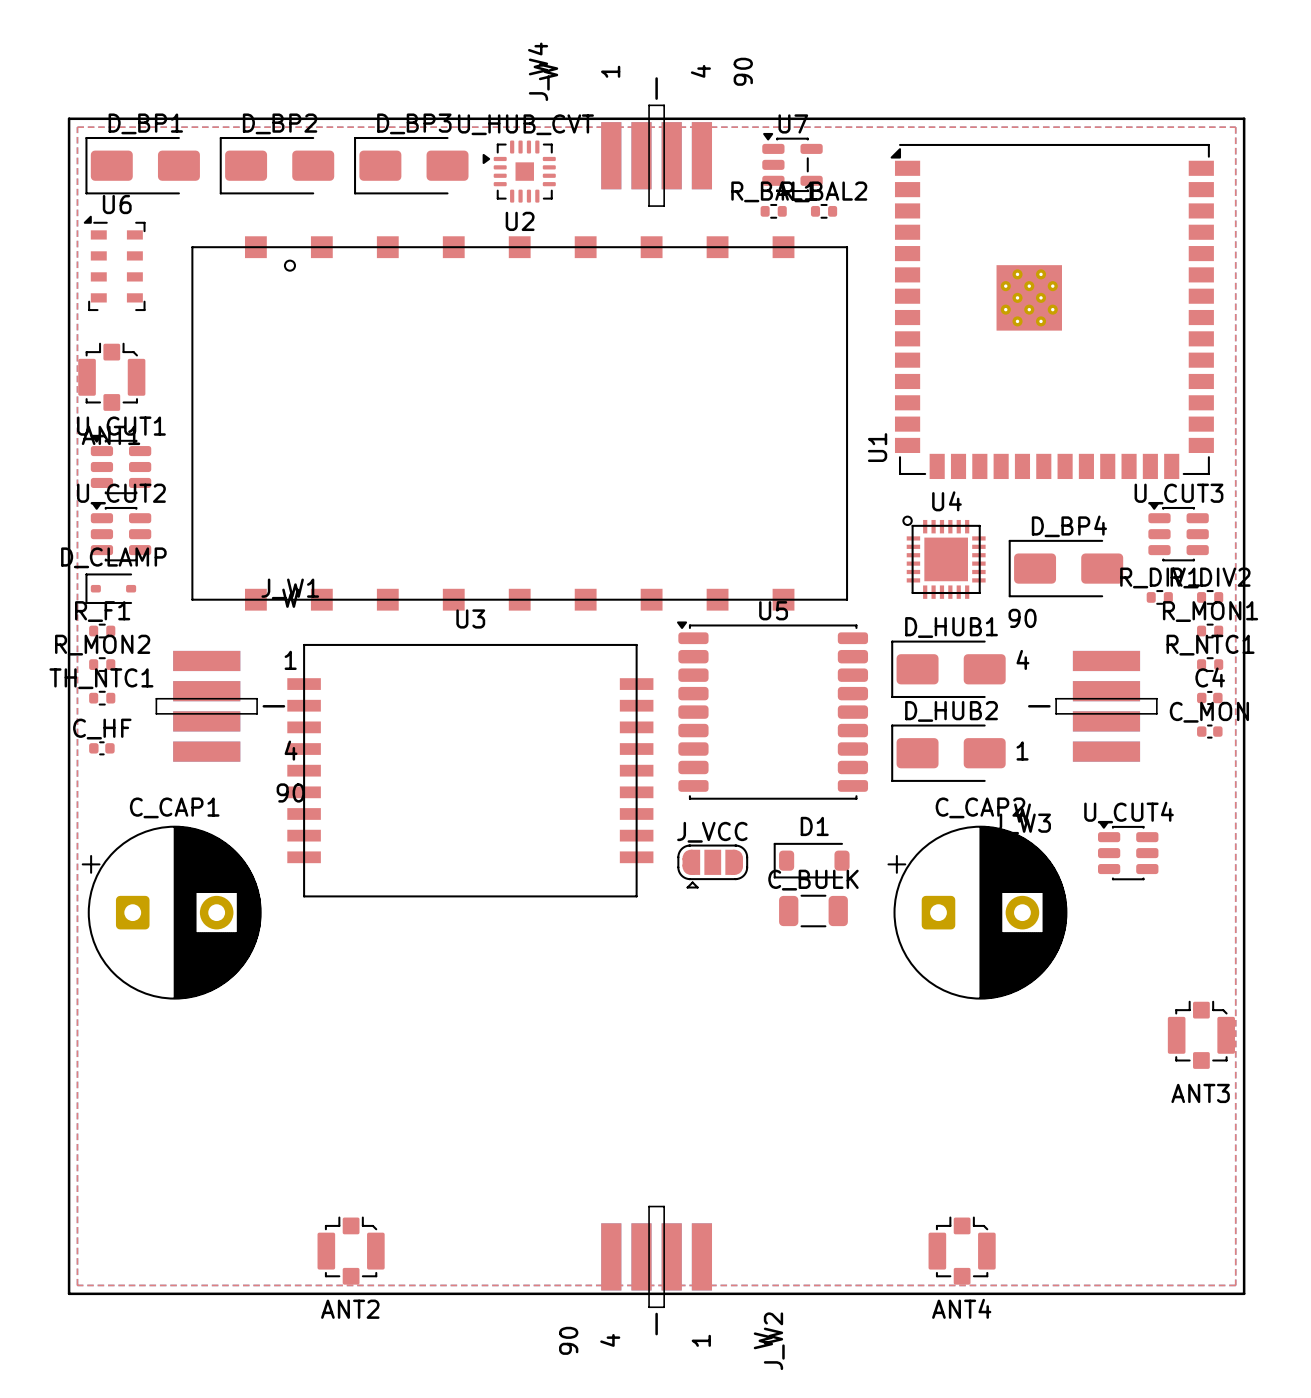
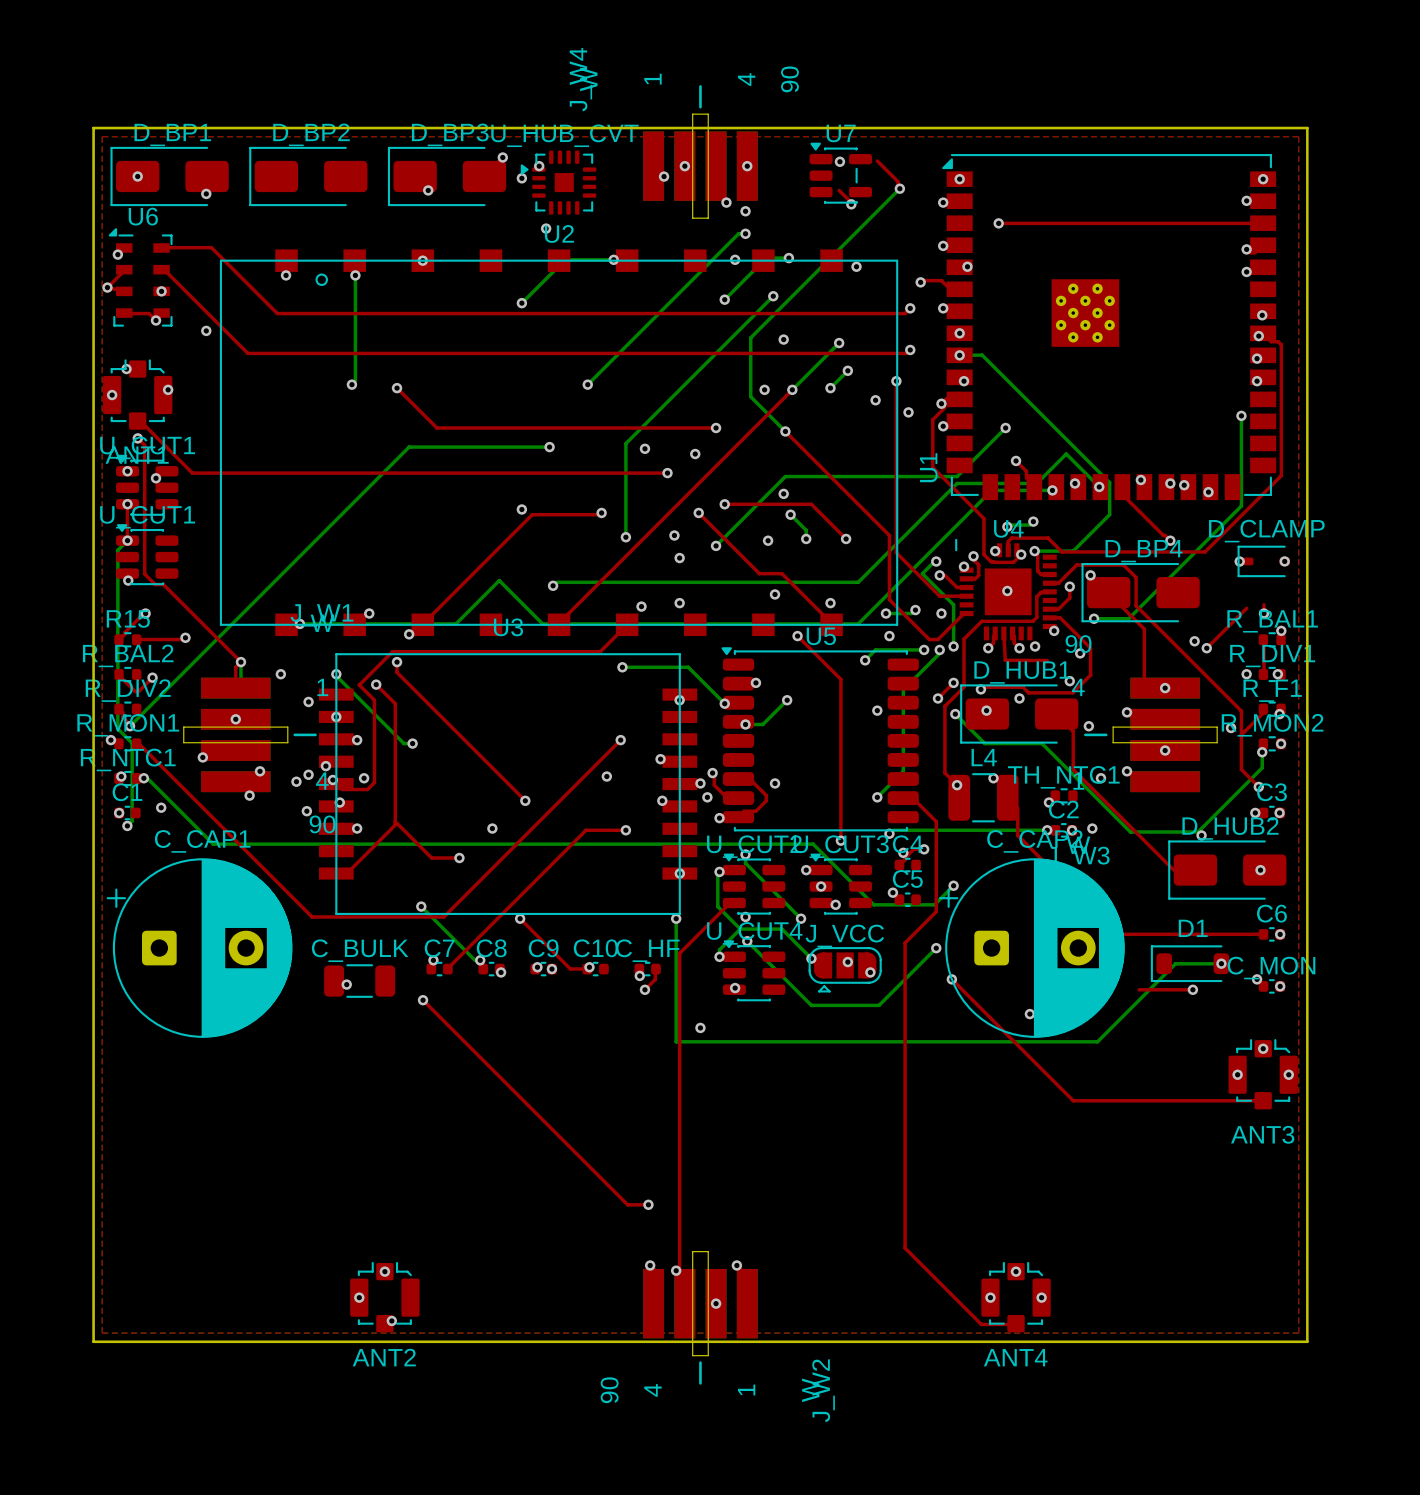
via: none -> (502, 157)
top track: none -> (877, 160) (898, 181) (898, 186)
via: none -> (839, 161)
via: none -> (539, 166)
via: none -> (684, 166)
via: none -> (747, 166)
via: none -> (137, 176)
via: none -> (664, 176)
via: none -> (521, 178)
via: none -> (959, 179)
via: none -> (1263, 179)
bottom track: none -> (899, 188) (750, 337) (750, 396) (785, 431)
via: none -> (899, 188)
via: none -> (428, 190)
top track: none -> (839, 190) (851, 202)
via: none -> (206, 193)
via: none -> (1246, 200)
via: none -> (726, 202)
via: none -> (943, 202)
via: none -> (851, 204)
via: none -> (745, 211)
R_BAL1 position: (773, 211) -> (1272, 639)
R_BAL2 position: (824, 211) -> (127, 674)
top track: none -> (998, 223) (1262, 223)
via: none -> (998, 223)
via: none -> (546, 228)
bottom track: none -> (745, 233) (738, 233) (587, 384)
via: none -> (745, 233)
via: none -> (943, 245)
top track: none -> (161, 247) (211, 247) (277, 313) (905, 313) (910, 308)
via: none -> (1246, 249)
top track: none -> (1250, 252) (1255, 252)
via: none -> (117, 254)
bottom track: none -> (788, 258) (766, 258) (724, 299)
via: none -> (788, 258)
bottom track: none -> (613, 259) (565, 259) (521, 303)
via: none -> (613, 259)
via: none -> (735, 259)
via: none -> (422, 260)
via: none -> (856, 266)
via: none -> (967, 266)
top track: none -> (124, 269) (107, 287) (124, 291)
top track: none -> (164, 270) (247, 353) (906, 353)
via: none -> (1246, 271)
via: none -> (286, 275)
bottom track: none -> (355, 275) (355, 381)
via: none -> (355, 275)
top track: none -> (922, 280) (941, 280) (950, 289)
via: none -> (920, 282)
via: none -> (107, 287)
via: none -> (161, 291)
bottom track: none -> (773, 296) (625, 443) (625, 537)
via: none -> (773, 296)
via: none -> (724, 299)
via: none -> (521, 303)
via: none -> (910, 308)
via: none -> (943, 308)
top track: none -> (124, 313) (149, 313) (154, 318)
via: none -> (1262, 315)
via: none -> (156, 320)
via: none -> (206, 330)
via: none -> (959, 333)
top track: none -> (1263, 333) (1271, 341) (1278, 341) (1281, 344) (1281, 475) (1205, 551) (1061, 551) (1048, 538) (1011, 538) (1008, 541) (1008, 550)
via: none -> (1258, 336)
via: none -> (783, 339)
bottom track: none -> (839, 343) (792, 389)
via: none -> (839, 343)
via: none -> (910, 349)
bottom track: none -> (959, 355) (982, 355) (1109, 482) (1109, 514) (1073, 551) (1034, 551)
via: none -> (959, 355)
via: none -> (1257, 358)
via: none -> (126, 369)
bottom track: none -> (847, 370) (830, 388)
via: none -> (847, 370)
top track: none -> (896, 381) (896, 552) (939, 596) (967, 596)
via: none -> (896, 381)
via: none -> (964, 381)
via: none -> (1257, 381)
via: none -> (351, 384)
via: none -> (587, 384)
top track: none -> (397, 388) (436, 428) (716, 428)
via: none -> (397, 388)
via: none -> (830, 388)
via: none -> (168, 389)
via: none -> (764, 389)
top track: none -> (792, 389) (560, 622)
via: none -> (792, 389)
via: none -> (112, 395)
top track: none -> (946, 398) (943, 401)
via: none -> (875, 400)
via: none -> (941, 403)
top track: none -> (944, 407) (932, 419) (932, 467) (983, 518) (983, 554) (990, 561) (1013, 562) (1021, 554)
via: none -> (908, 412)
bottom track: none -> (1241, 415) (1241, 506) (1128, 618) (1094, 618)
via: none -> (1241, 415)
top track: none -> (145, 426) (192, 473) (665, 473)
via: none -> (943, 426)
via: none -> (716, 428)
bottom track: none -> (1005, 428) (957, 476) (785, 476) (716, 545)
via: none -> (1005, 428)
top track: none -> (785, 431) (889, 535) (889, 599) (929, 639) (938, 639) (964, 613)
via: none -> (785, 431)
top track: none -> (137, 438) (144, 445) (144, 574) (155, 584) (163, 584) (240, 662) (235, 667) (235, 688)
via: none -> (137, 438)
bottom track: none -> (549, 447) (409, 447) (129, 726)
via: none -> (549, 447)
via: none -> (644, 448)
via: none -> (695, 454)
top track: none -> (1016, 460) (1026, 471) (1026, 478)
via: none -> (1016, 460)
via: none -> (127, 471)
via: none -> (667, 473)
via: none -> (156, 478)
via: none -> (1140, 480)
via: none -> (1074, 483)
via: none -> (1170, 483)
via: none -> (1184, 485)
bottom track: none -> (1099, 486) (1066, 454) (1036, 483) (957, 483) (858, 582) (556, 582)
via: none -> (1099, 486)
bottom track: none -> (1050, 490) (991, 490) (858, 623) (542, 623) (499, 580) (455, 623) (299, 623)
via: none -> (1052, 490)
via: none -> (1208, 492)
via: none -> (783, 493)
top track: none -> (1121, 493) (1170, 540)
via: none -> (127, 504)
top track: none -> (127, 504) (127, 540)
top track: none -> (724, 504) (811, 504) (846, 538)
via: none -> (724, 504)
via: none -> (521, 509)
via: none -> (601, 512)
top track: none -> (698, 512) (759, 573) (781, 573) (832, 623)
via: none -> (698, 512)
top track: none -> (599, 514) (532, 514) (423, 623)
bottom track: none -> (790, 514) (806, 530) (806, 538)
via: none -> (790, 514)
U_CUT2 name: U_CUT2 (121, 494) -> U_CUT1 (147, 517)
via: none -> (1033, 521)
bottom track: none -> (1009, 525) (1029, 525)
via: none -> (1007, 526)
via: none -> (674, 535)
via: none -> (625, 537)
U4 footprint: [902, 515, 986, 599] -> [955, 538, 1057, 641]
via: none -> (806, 538)
via: none -> (846, 538)
bottom track: none -> (127, 540) (117, 550) (117, 728) (132, 743) (132, 821) (127, 825)
via: none -> (127, 540)
via: none -> (768, 540)
via: none -> (1170, 540)
via: none -> (716, 545)
via: none -> (995, 551)
via: none -> (1034, 551)
via: none -> (1021, 554)
top track: none -> (1037, 554) (1038, 571) (1041, 574) (1049, 574)
U_CUT3 position: (1178, 531) -> (840, 884)
via: none -> (973, 556)
via: none -> (679, 558)
top track: none -> (972, 558) (978, 565) (978, 575) (975, 578) (966, 578)
bottom track: none -> (934, 561) (922, 573) (953, 604) (953, 646)
via: none -> (936, 561)
via: none -> (1239, 561)
D_CLAMP: none -> (1263, 561)
via: none -> (1284, 561)
via: none -> (964, 566)
via: none -> (939, 575)
top track: none -> (944, 575) (957, 587) (967, 587)
top track: none -> (1090, 575) (1144, 629) (1144, 688)
via: none -> (1090, 575)
via: none -> (128, 580)
top track: none -> (1049, 583) (1058, 583) (1076, 564) (1123, 564) (1136, 577) (1136, 605) (1241, 711) (1241, 769) (1258, 786)
via: none -> (553, 585)
top track: none -> (1069, 586) (1069, 597) (1058, 609) (1049, 609)
via: none -> (1069, 586)
via: none -> (1007, 590)
top track: none -> (1049, 592) (1041, 592) (1036, 596) (1036, 617) (1032, 621) (981, 621) (964, 639) (964, 687) (944, 706) (944, 773) (957, 785)
D_BP4 position: (1065, 568) -> (1140, 592)
via: none -> (775, 594)
via: none -> (679, 603)
via: none -> (830, 603)
top track: none -> (1263, 604) (1263, 613)
via: none -> (641, 606)
top track: none -> (1246, 608) (1206, 648)
via: none -> (915, 610)
D_CLAMP: (110, 588) -> none
top track: none -> (143, 613) (119, 639)
via: none -> (145, 613)
via: none -> (369, 613)
bottom track: none -> (885, 613) (911, 613)
via: none -> (885, 613)
via: none -> (941, 613)
via: none -> (1263, 613)
top track: none -> (1049, 617) (1060, 617) (1090, 648) (1090, 675) (1072, 692) (1028, 692) (1022, 687) (981, 687)
via: none -> (1094, 618)
R_DIV1 position: (1159, 597) -> (1272, 674)
R_DIV2 position: (1210, 597) -> (127, 709)
via: none -> (299, 623)
top track: none -> (627, 624) (600, 651) (392, 651) (359, 685) (374, 700) (374, 782) (367, 789) (341, 789)
via: none -> (1054, 630)
via: none -> (1281, 630)
via: none -> (409, 634)
top track: none -> (1003, 633) (1005, 660) (1047, 660)
top track: none -> (797, 636) (840, 679) (840, 840)
via: none -> (797, 636)
via: none -> (889, 636)
top track: none -> (993, 636) (993, 643) (988, 648)
top track: none -> (1014, 636) (1014, 643) (1019, 648)
via: none -> (185, 637)
top track: none -> (136, 639) (185, 639)
top track: none -> (1263, 639) (1263, 674)
R15: none -> (127, 639)
via: none -> (1194, 641)
via: none -> (953, 646)
via: none -> (1035, 646)
via: none -> (988, 648)
via: none -> (1019, 648)
via: none -> (1206, 648)
bottom track: none -> (924, 649) (875, 649) (865, 660)
via: none -> (924, 649)
via: none -> (939, 649)
bottom track: none -> (939, 653) (903, 689) (903, 771) (877, 797)
via: none -> (1080, 653)
R_F1 position: (102, 631) -> (1272, 709)
R_MON1 position: (1210, 631) -> (127, 743)
via: none -> (865, 660)
bottom track: none -> (240, 662) (240, 682)
via: none -> (240, 662)
top track: none -> (397, 662) (397, 672) (523, 799)
via: none -> (397, 662)
bottom track: none -> (622, 667) (688, 667) (724, 703)
via: none -> (622, 667)
via: none -> (280, 674)
via: none -> (336, 674)
via: none -> (1246, 674)
via: none -> (1277, 674)
top track: none -> (119, 675) (135, 691) (138, 691) (152, 677)
bottom track: none -> (336, 675) (403, 743) (412, 743)
via: none -> (152, 677)
via: none -> (1069, 681)
via: none -> (755, 682)
top track: none -> (953, 682) (938, 698)
via: none -> (953, 682)
top track: none -> (376, 684) (395, 703) (395, 825) (346, 873)
via: none -> (376, 684)
via: none -> (1165, 688)
via: none -> (980, 689)
R_MON2 position: (102, 664) -> (1272, 743)
R_NTC1 position: (1210, 664) -> (127, 778)
D_HUB1 position: (948, 669) -> (1019, 714)
via: none -> (938, 698)
via: none -> (1019, 698)
via: none -> (679, 700)
bottom track: none -> (787, 700) (762, 724) (745, 724)
via: none -> (787, 700)
via: none -> (308, 701)
via: none -> (724, 703)
via: none -> (877, 710)
via: none -> (986, 710)
top track: none -> (123, 712) (123, 717) (129, 724)
via: none -> (1127, 712)
top track: none -> (1263, 712) (1241, 734)
bottom track: none -> (955, 714) (984, 743) (1042, 743) (1130, 832) (1198, 832) (1262, 767) (1262, 752)
via: none -> (955, 714)
top track: none -> (1055, 714) (1073, 731) (1073, 769) (1173, 870)
via: none -> (1279, 714)
via: none -> (336, 716)
via: none -> (235, 719)
via: none -> (745, 724)
via: none -> (129, 726)
via: none -> (1088, 726)
C4 position: (1209, 697) -> (907, 865)
TH_NTC1 position: (102, 698) -> (1064, 795)
via: none -> (1231, 727)
via: none -> (110, 740)
via: none -> (357, 740)
top track: none -> (620, 740) (443, 916) (312, 916) (138, 743)
via: none -> (620, 740)
via: none -> (412, 743)
via: none -> (1281, 743)
via: none -> (1165, 750)
via: none -> (1262, 752)
via: none -> (202, 757)
via: none -> (660, 759)
C_MON position: (1209, 731) -> (1271, 986)
via: none -> (325, 766)
via: none -> (260, 771)
via: none -> (1127, 771)
via: none -> (712, 773)
via: none -> (308, 774)
top track: none -> (714, 774) (714, 785) (726, 797)
via: none -> (121, 776)
via: none -> (606, 776)
C_HF: (101, 748) -> none
via: none -> (143, 778)
bottom track: none -> (147, 778) (213, 844) (813, 844) (873, 904) (934, 904) (953, 885)
via: none -> (364, 778)
top track: none -> (749, 778) (766, 795) (766, 800) (755, 811) (743, 811)
via: none -> (993, 778)
via: none -> (1100, 778)
via: none -> (332, 779)
via: none -> (296, 781)
via: none -> (700, 783)
via: none -> (775, 783)
D_HUB2 position: (948, 753) -> (1227, 870)
via: none -> (957, 785)
via: none -> (1258, 786)
via: none -> (249, 795)
via: none -> (707, 797)
via: none -> (877, 797)
top track: none -> (911, 797) (936, 821) (936, 911) (905, 942) (905, 1248) (981, 1324) (1016, 1324)
L4: none -> (983, 797)
U3 position: (470, 770) -> (508, 784)
via: none -> (525, 800)
via: none -> (662, 800)
via: none -> (339, 802)
via: none -> (1048, 802)
via: none -> (161, 807)
top track: none -> (1017, 807) (1017, 835) (1116, 934) (1263, 934)
via: none -> (306, 811)
via: none -> (119, 813)
C1: none -> (127, 813)
via: none -> (1255, 812)
C3: none -> (1271, 813)
via: none -> (1279, 812)
via: none -> (719, 818)
top track: none -> (395, 821) (431, 858) (459, 858)
via: none -> (127, 825)
via: none -> (357, 828)
via: none -> (492, 828)
via: none -> (1092, 828)
top track: none -> (625, 830) (586, 830) (447, 968)
via: none -> (625, 830)
bottom track: none -> (892, 830) (1047, 830)
via: none -> (1047, 830)
C2: none -> (1063, 830)
via: none -> (1072, 830)
via: none -> (889, 833)
via: none -> (1201, 835)
via: none -> (840, 840)
top track: none -> (924, 849) (913, 849) (899, 864)
via: none -> (924, 849)
via: none -> (903, 852)
bottom track: none -> (745, 854) (745, 863) (801, 918)
via: none -> (745, 854)
via: none -> (459, 858)
via: none -> (806, 870)
via: none -> (1260, 870)
via: none -> (719, 871)
via: none -> (679, 873)
bottom track: none -> (717, 873) (717, 906) (740, 929)
U_CUT2: none -> (754, 884)
U_CUT4 position: (1128, 850) -> (754, 970)
via: none -> (953, 885)
via: none -> (821, 886)
via: none -> (892, 892)
D1 position: (811, 860) -> (1190, 963)
C5: none -> (907, 899)
J_VCC position: (712, 866) -> (845, 969)
top track: none -> (729, 903) (679, 953) (679, 1270)
via: none -> (835, 904)
bottom track: none -> (421, 906) (475, 960)
via: none -> (421, 906)
via: none -> (745, 916)
top track: none -> (520, 918) (570, 968) (587, 968)
via: none -> (520, 918)
bottom track: none -> (676, 918) (676, 1041) (1097, 1041) (1175, 963) (1220, 963)
via: none -> (676, 918)
via: none -> (801, 918)
bottom track: none -> (740, 929) (719, 949) (719, 956)
bottom track: none -> (740, 929) (781, 929) (811, 958)
C6: none -> (1271, 934)
via: none -> (1280, 934)
bottom track: none -> (747, 941) (811, 1005) (879, 1005) (936, 948)
via: none -> (747, 941)
C_BULK: (813, 911) -> none
via: none -> (936, 948)
via: none -> (719, 956)
via: none -> (811, 958)
via: none -> (433, 960)
via: none -> (480, 960)
via: none -> (847, 962)
via: none -> (1221, 963)
via: none -> (537, 967)
via: none -> (589, 967)
C7: none -> (439, 969)
C8: none -> (491, 969)
C9: none -> (543, 969)
via: none -> (551, 969)
C10: none -> (595, 969)
C_HF: none -> (647, 969)
top track: none -> (655, 969) (655, 979) (644, 989)
via: none -> (501, 972)
via: none -> (870, 972)
via: none -> (639, 975)
top track: none -> (951, 979) (1073, 1100) (1263, 1100)
via: none -> (951, 979)
via: none -> (1257, 979)
C_BULK: none -> (359, 981)
via: none -> (346, 984)
via: none -> (1280, 986)
via: none -> (735, 988)
via: none -> (644, 989)
top track: none -> (1139, 989) (1192, 989)
via: none -> (1192, 989)
top track: none -> (423, 1000) (627, 1204) (648, 1204)
via: none -> (423, 1000)
via: none -> (1029, 1014)
via: none -> (700, 1027)
via: none -> (1263, 1048)
via: none -> (1237, 1074)
via: none -> (1288, 1074)
via: none -> (648, 1204)
via: none -> (650, 1265)
via: none -> (736, 1265)
via: none -> (384, 1271)
via: none -> (676, 1270)
via: none -> (1016, 1271)
via: none -> (359, 1297)
via: none -> (990, 1297)
via: none -> (1041, 1297)
via: none -> (716, 1303)
via: none -> (391, 1320)

